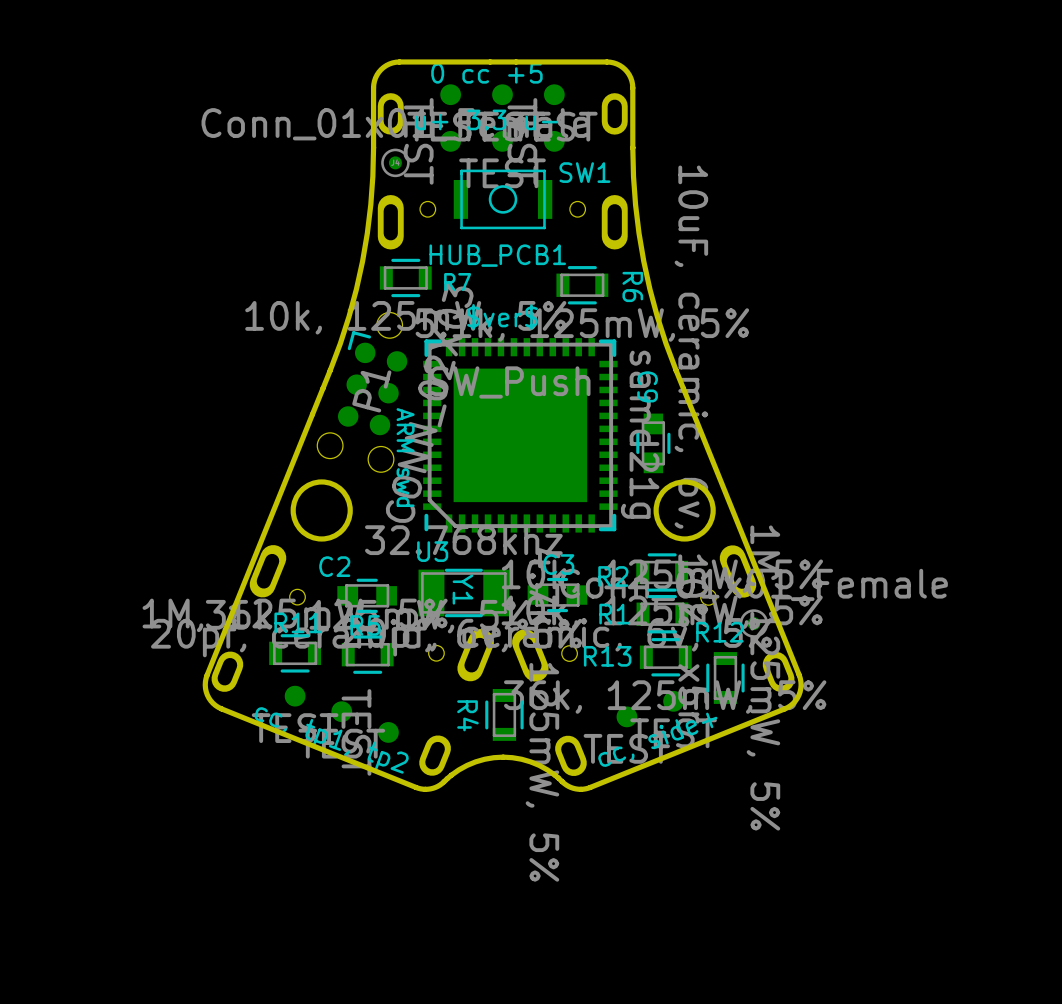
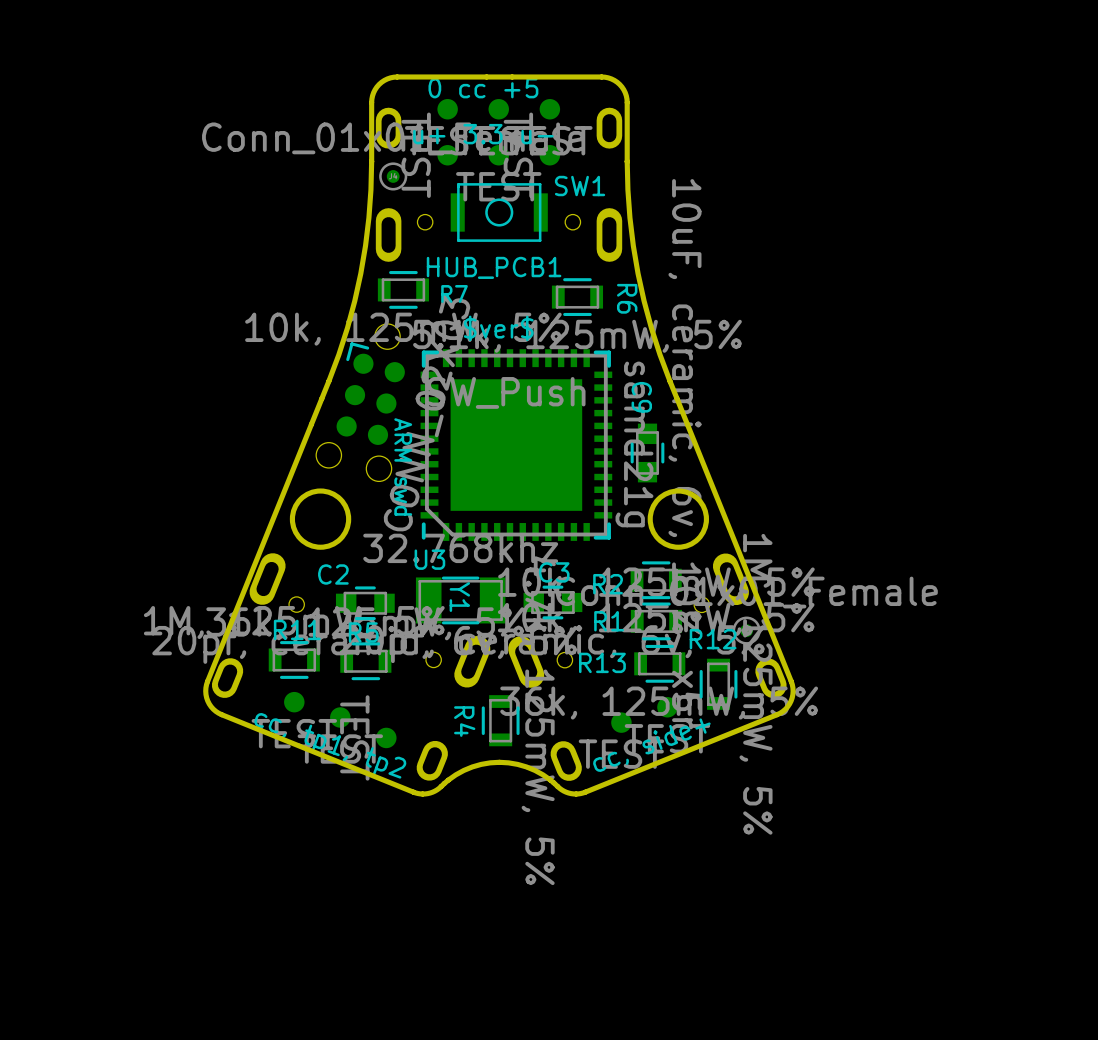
P1 name: P1 (371, 391) -> none

